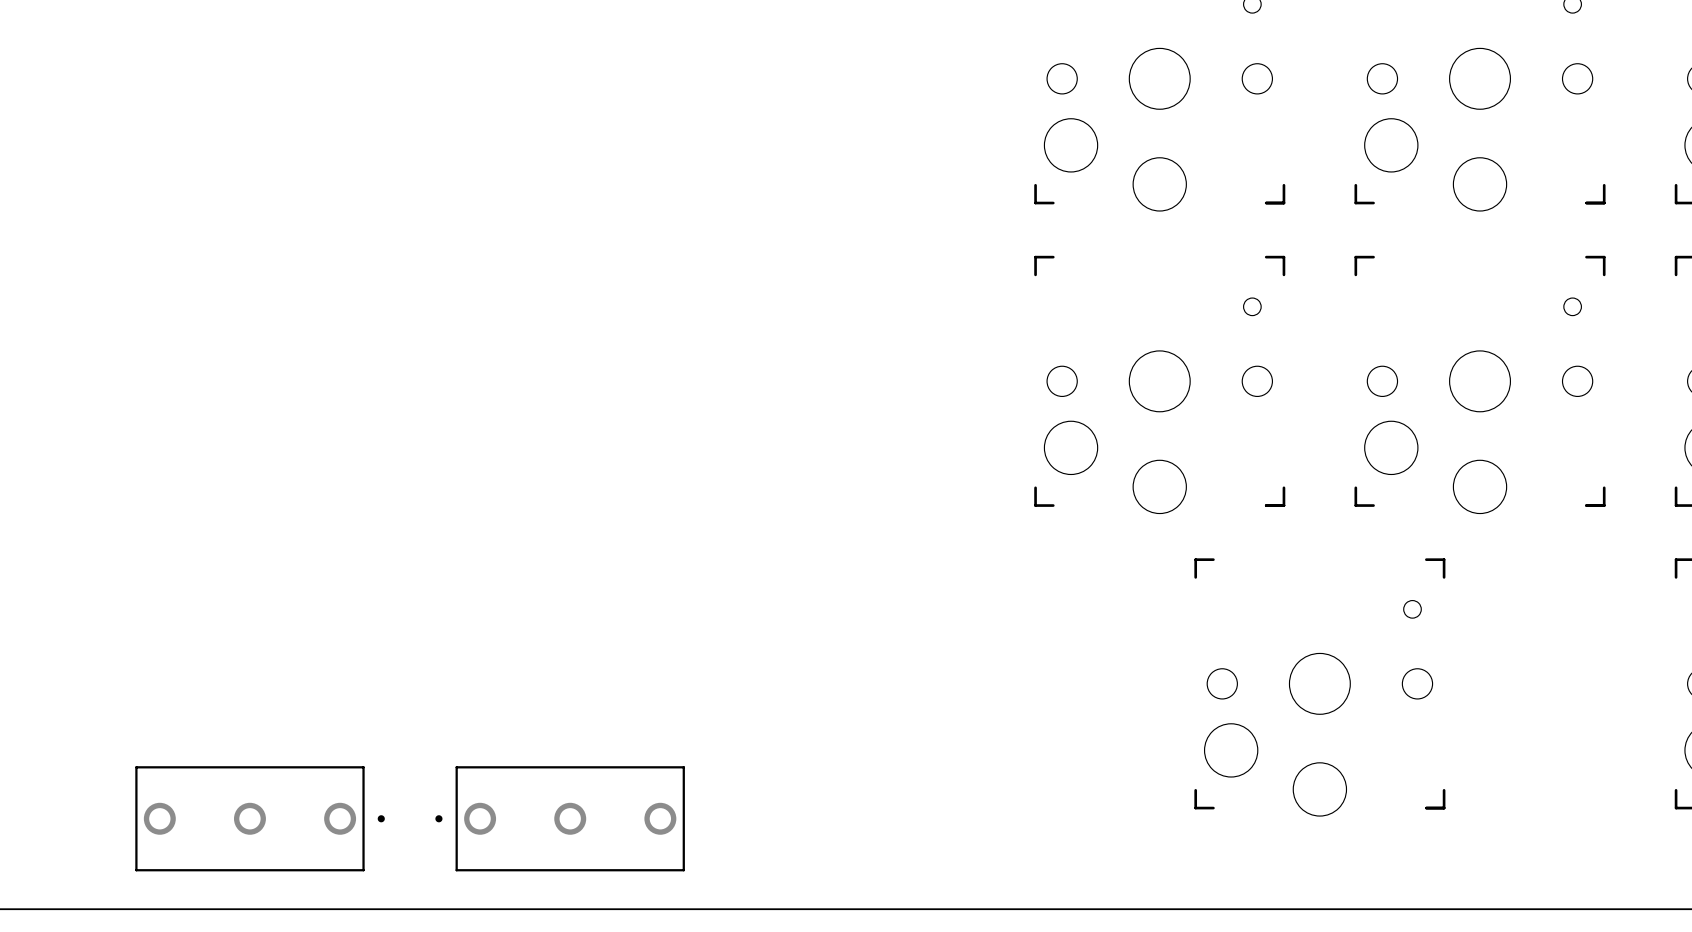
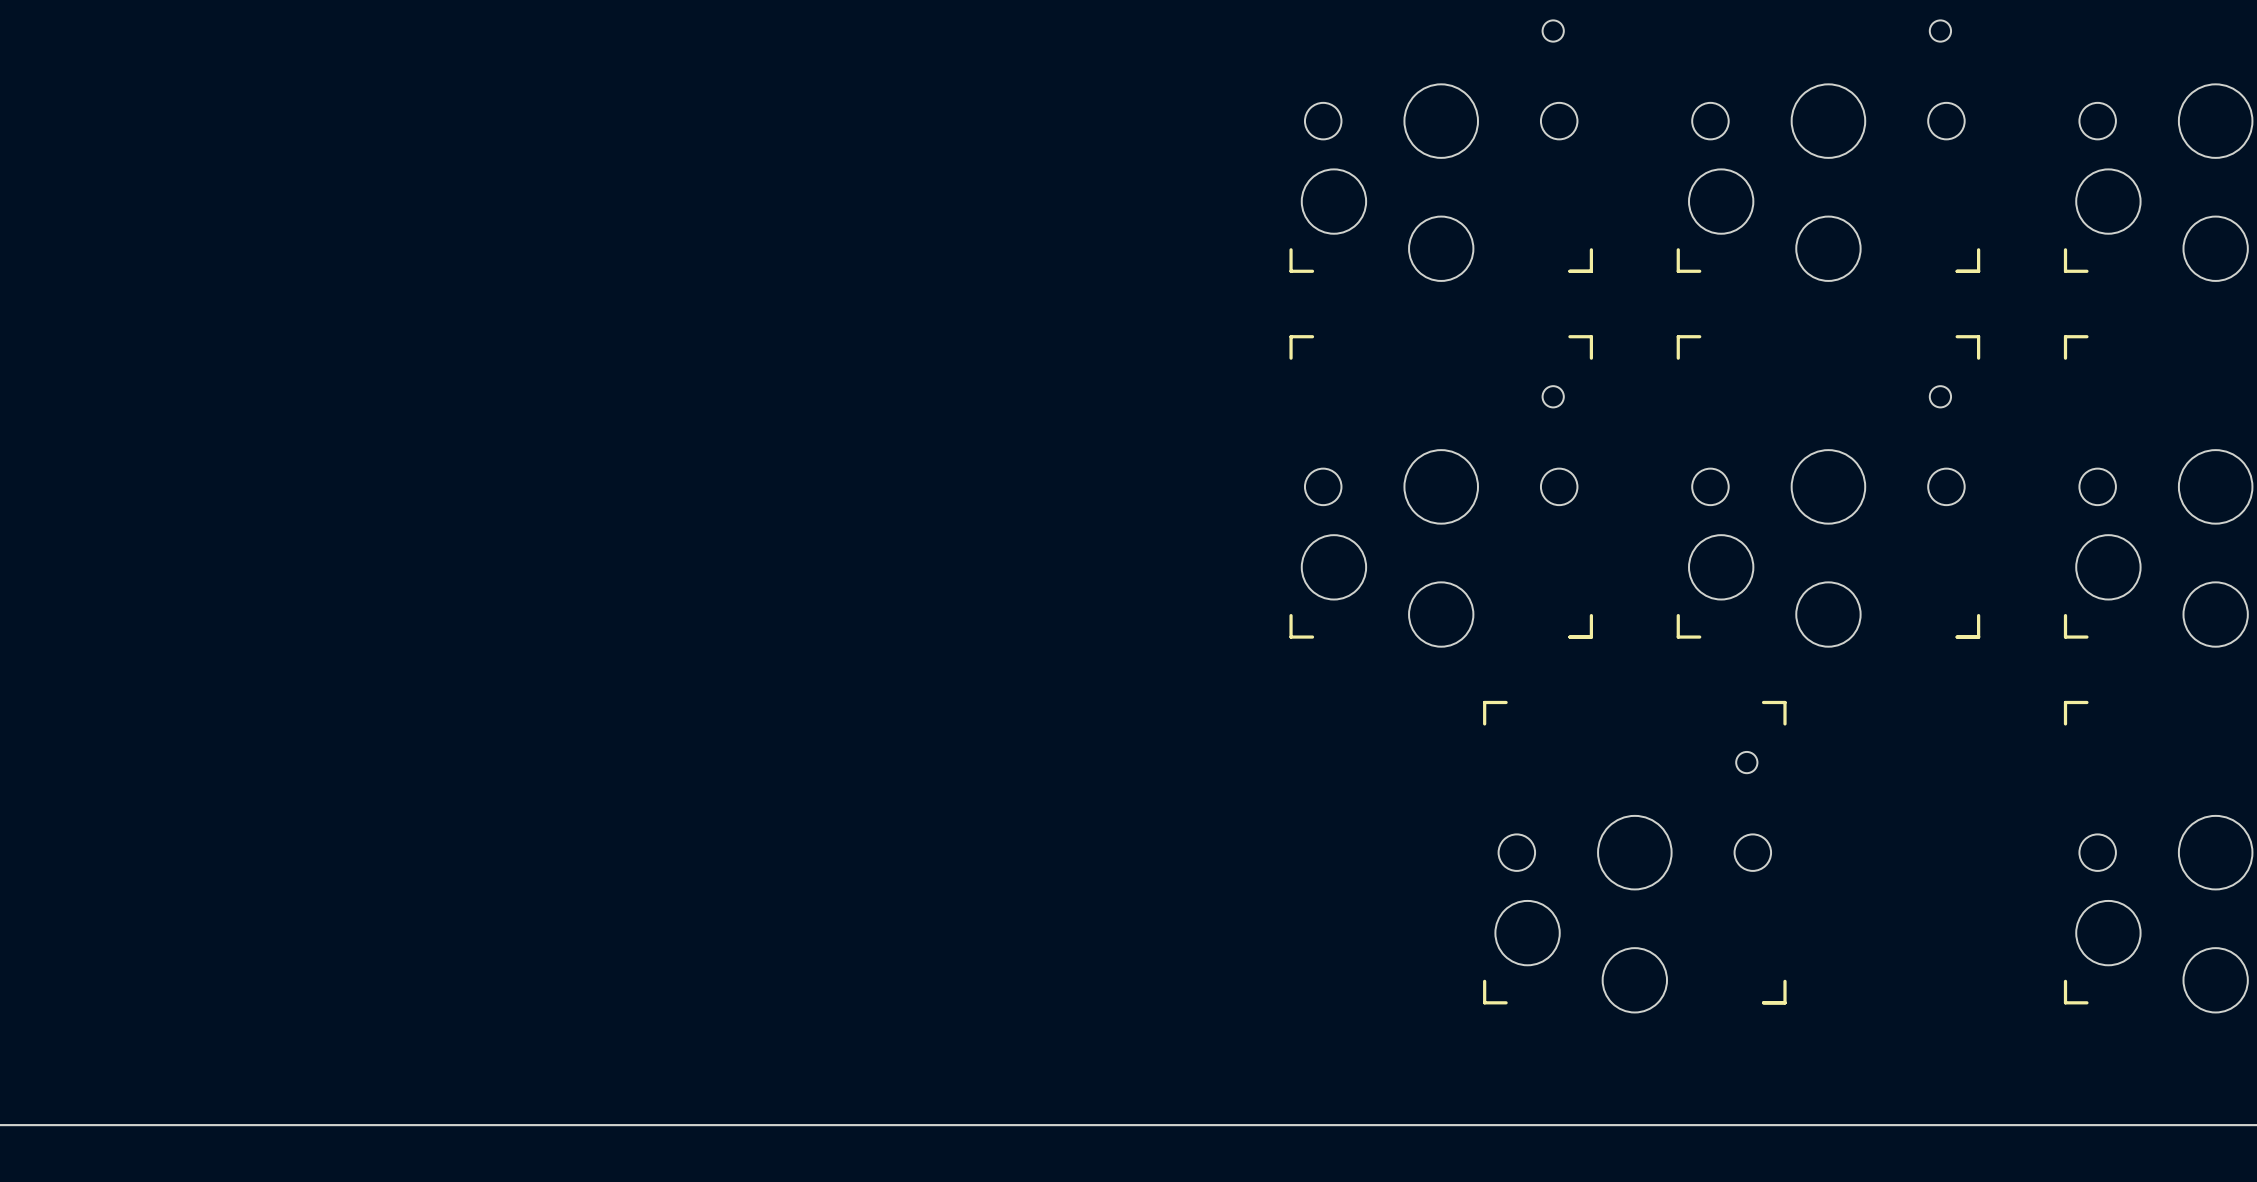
part: (260, 818) -> none
part: (560, 818) -> none

